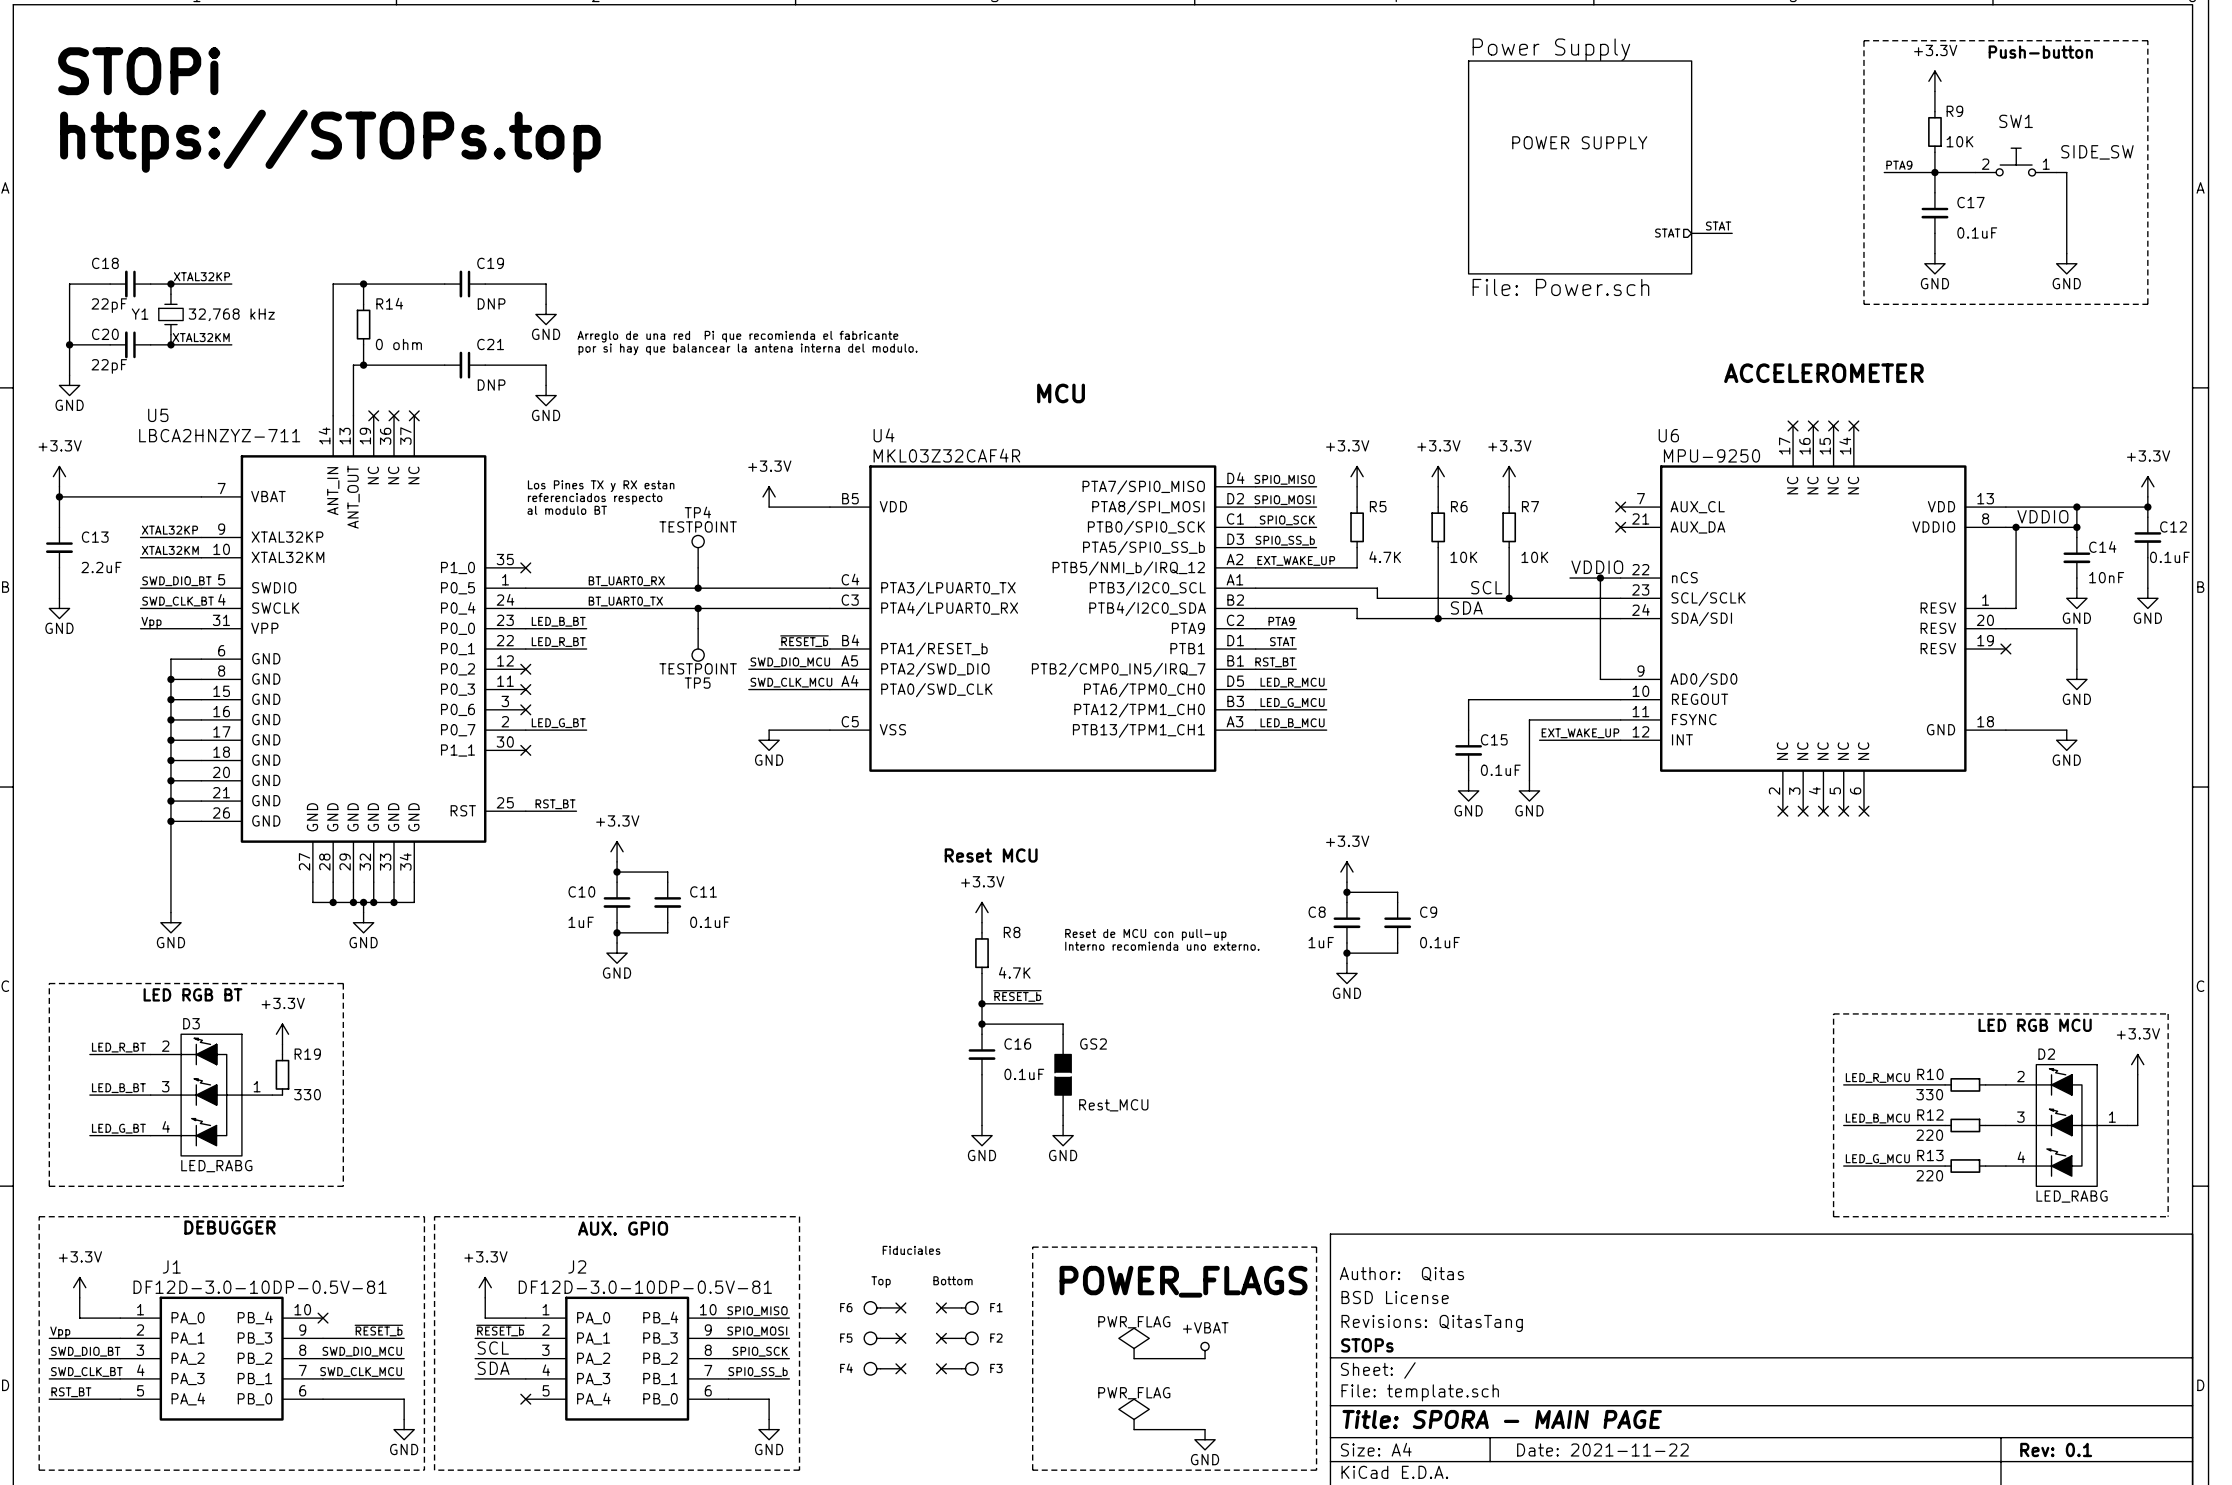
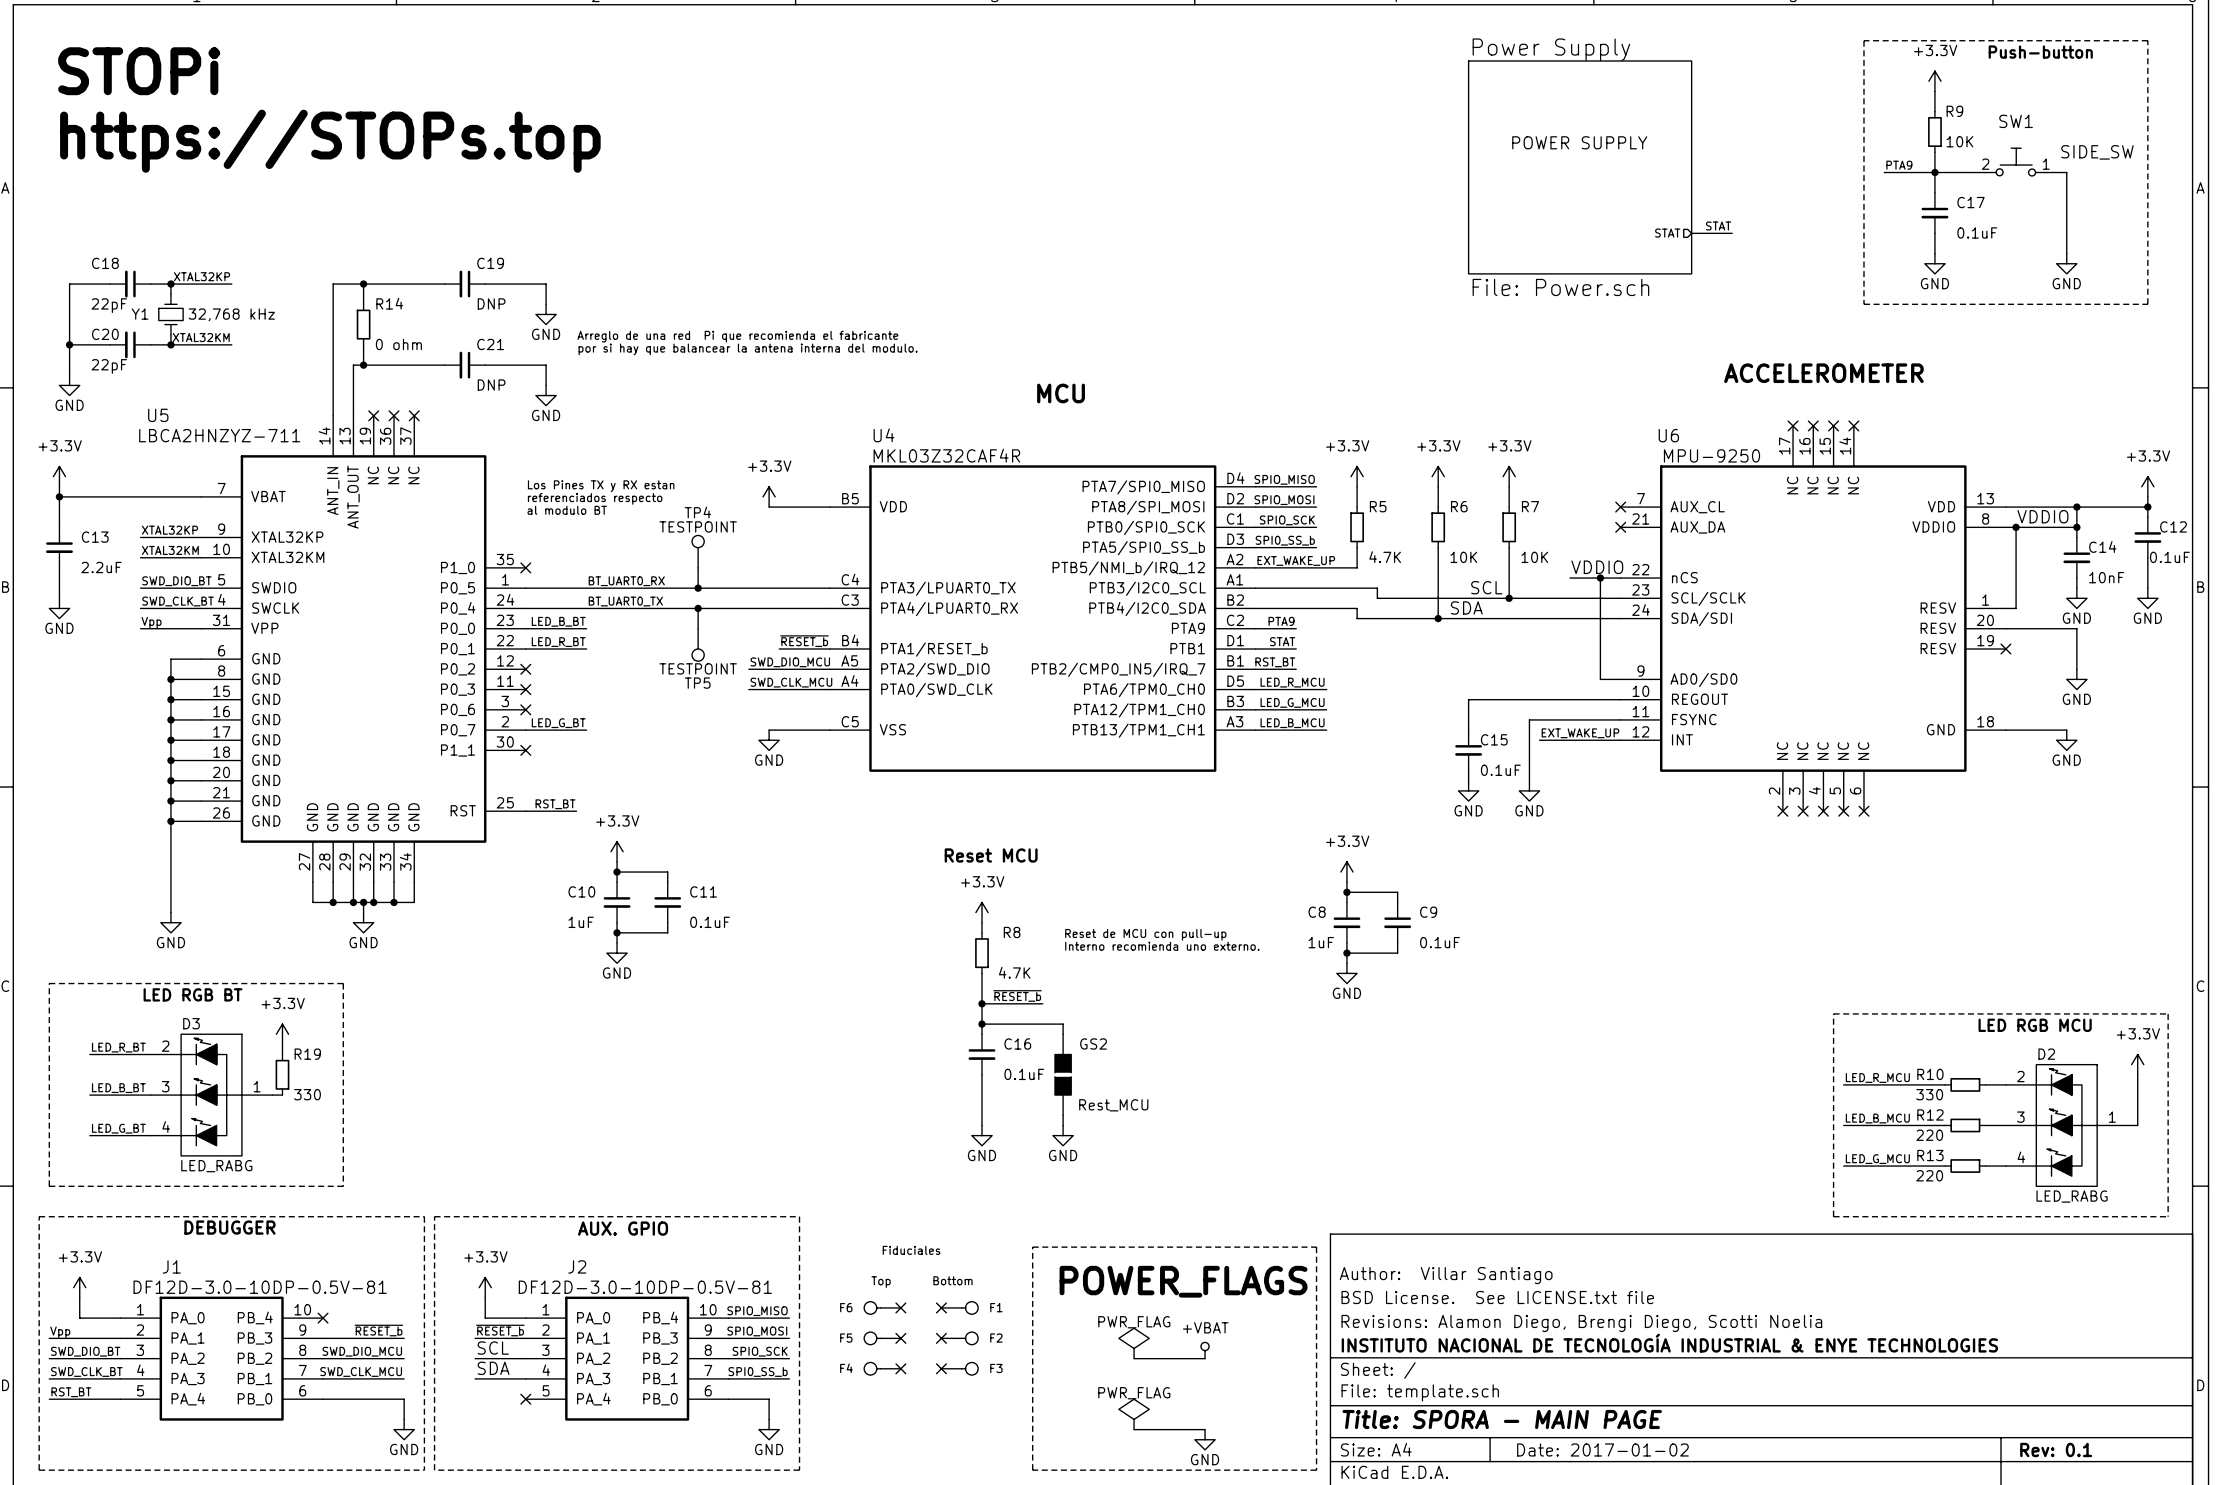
title block: Author: Qitas (1401, 1274) -> Author: Villar Santiago (1446, 1275)
title block: BSD License (1395, 1297) -> BSD License. See LICENSE.txt file (1497, 1297)
title block: Revisions: QitasTang (1432, 1323) -> Revisions: Alamon Diego, Brengi Diego, Scotti Noelia (1581, 1323)
title block: STOPs (1367, 1345) -> INSTITUTO NACIONAL DE TECNOLOGÍA INDUSTRIAL & ENYE TECHNOLOGIES (1669, 1343)
title block: Date: 2021-11-22 (1602, 1449) -> Date: 2017-01-02 (1602, 1449)

